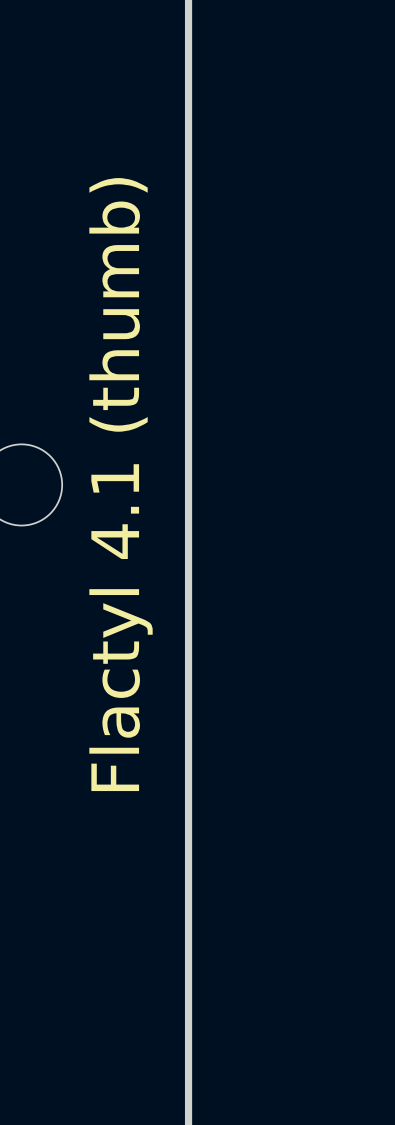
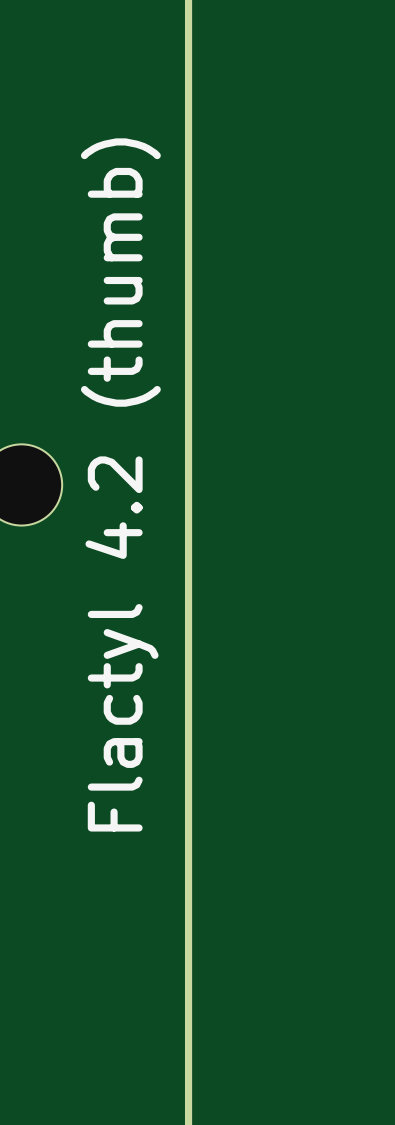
drawing shape: [89, 178, 153, 792] -> [80, 138, 161, 832]

